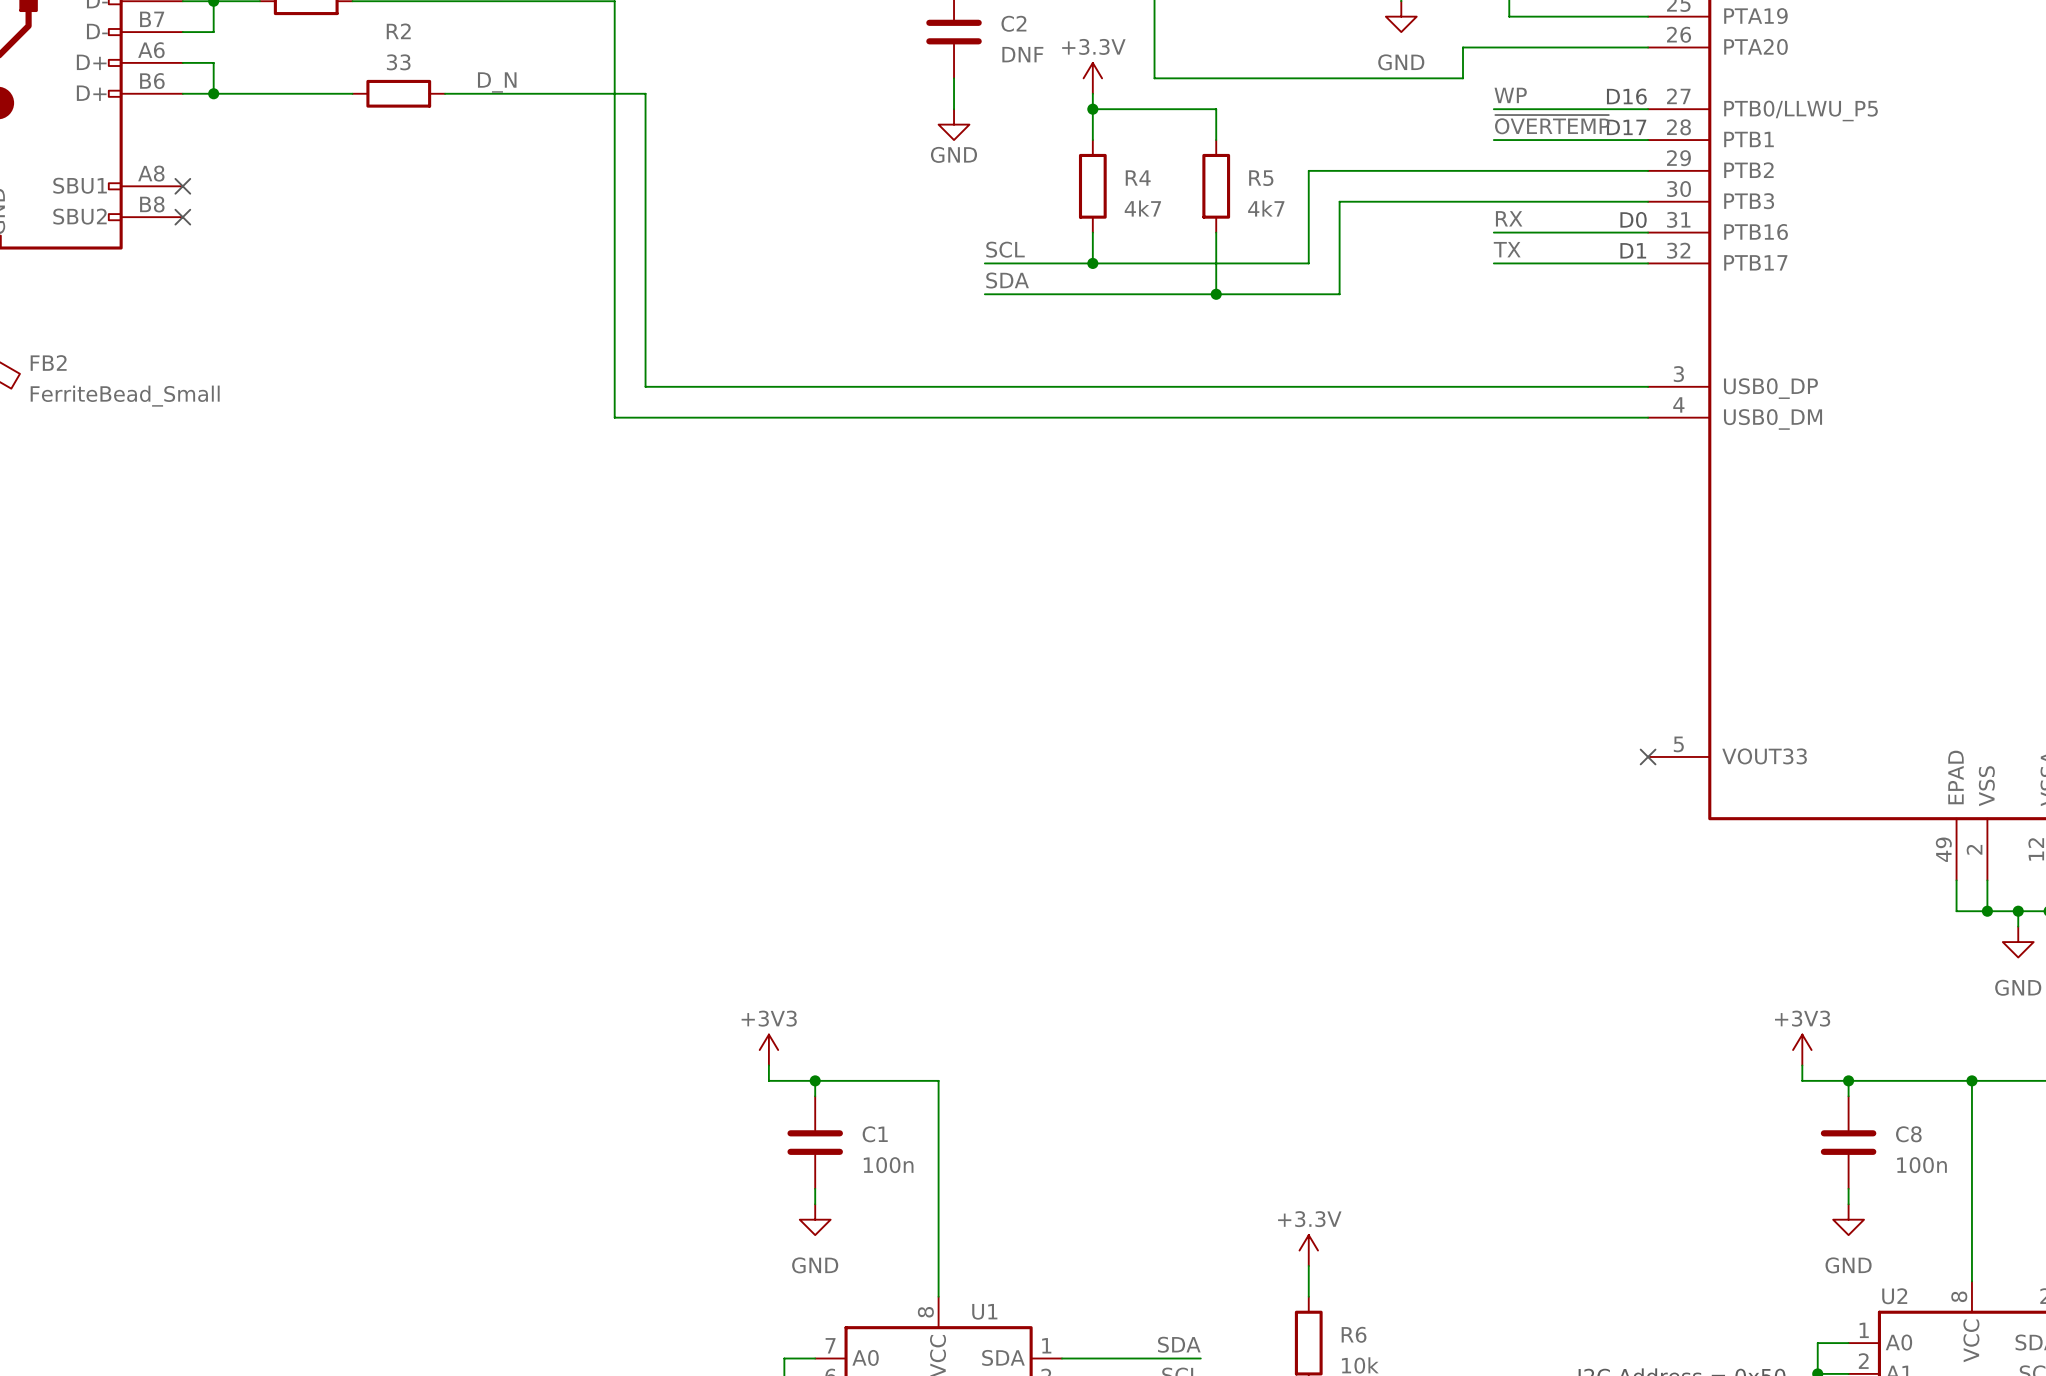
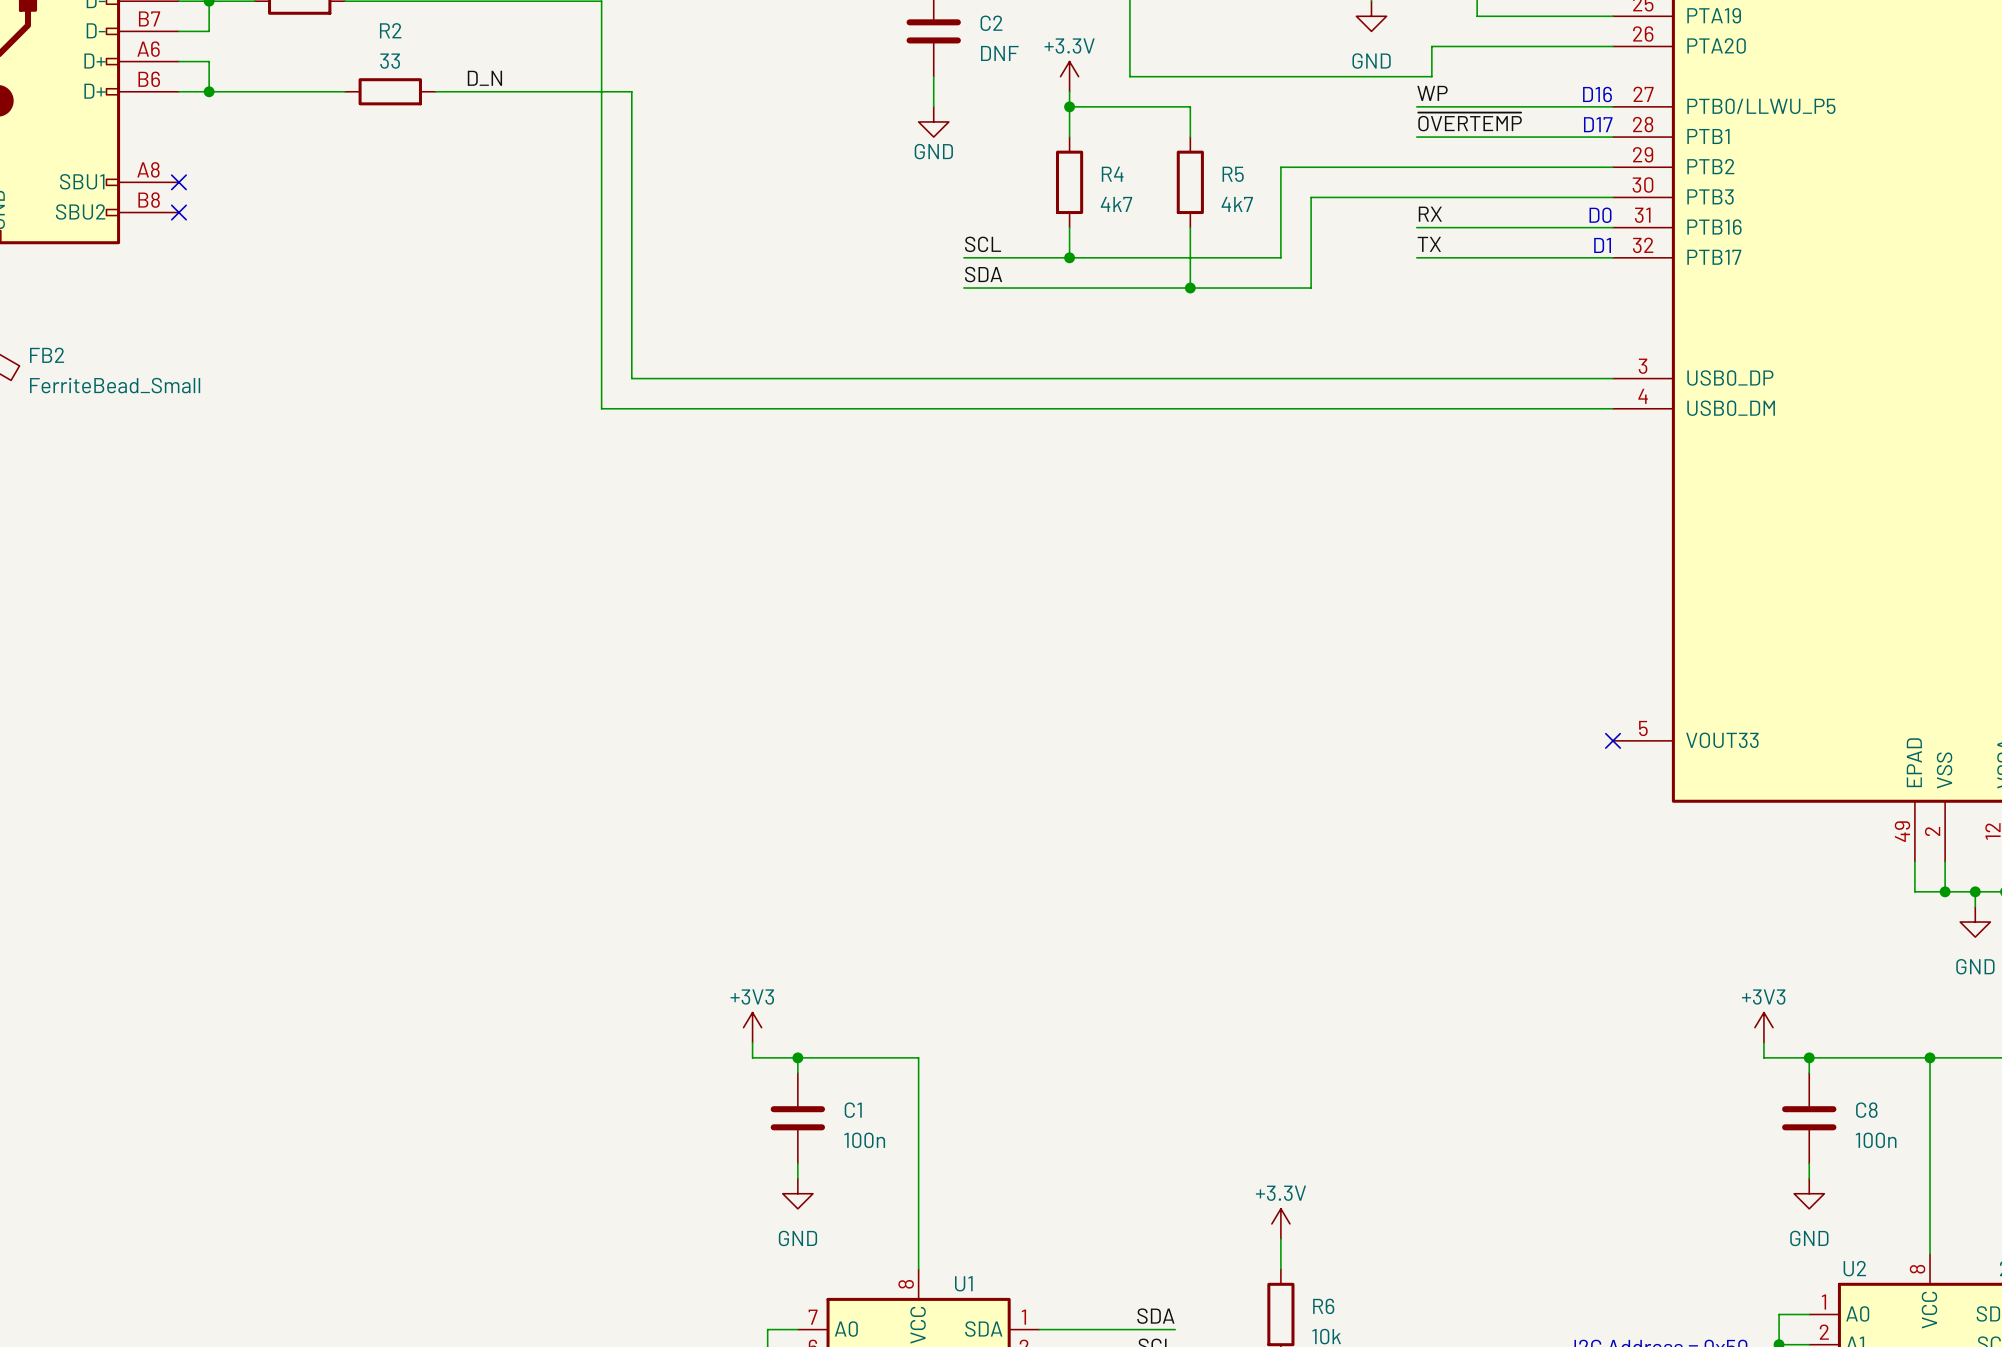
label position: WP (1510, 95) -> WP (1432, 93)
wire: none -> (1416, 106) (1462, 106)
label position: ~{OVERTEMP} (1552, 124) -> ~{OVERTEMP} (1470, 121)
wire: none -> (1416, 137) (1462, 137)
label position: RX (1509, 218) -> RX (1430, 214)
wire: none -> (1416, 227) (1462, 227)
label position: TX (1507, 249) -> TX (1429, 244)
wire: none -> (1416, 257) (1462, 257)

